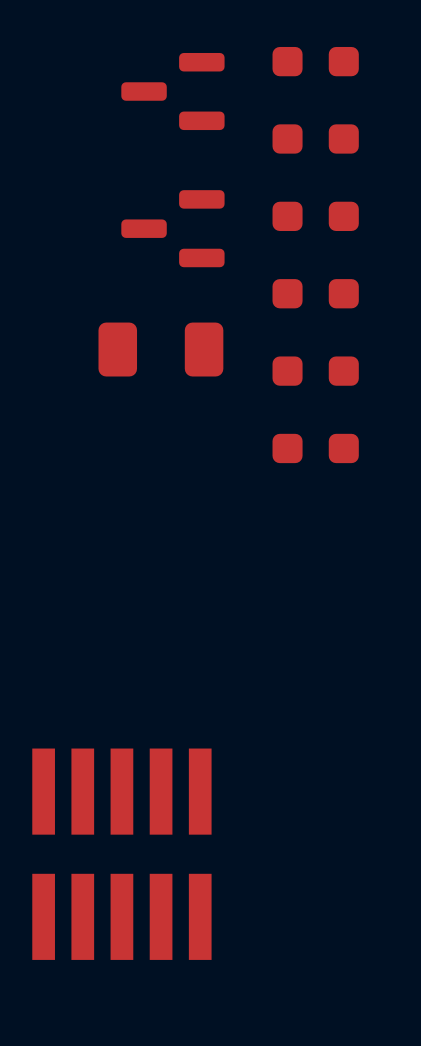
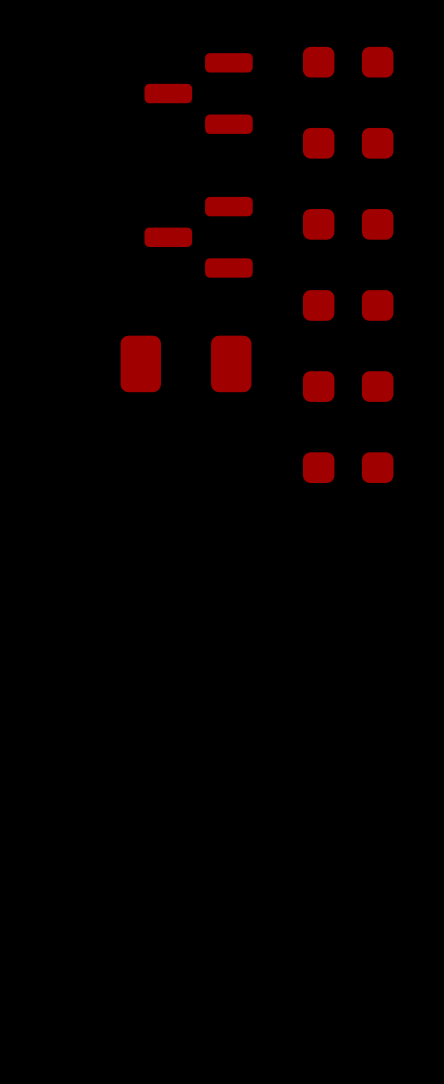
part: (121, 854) -> none

